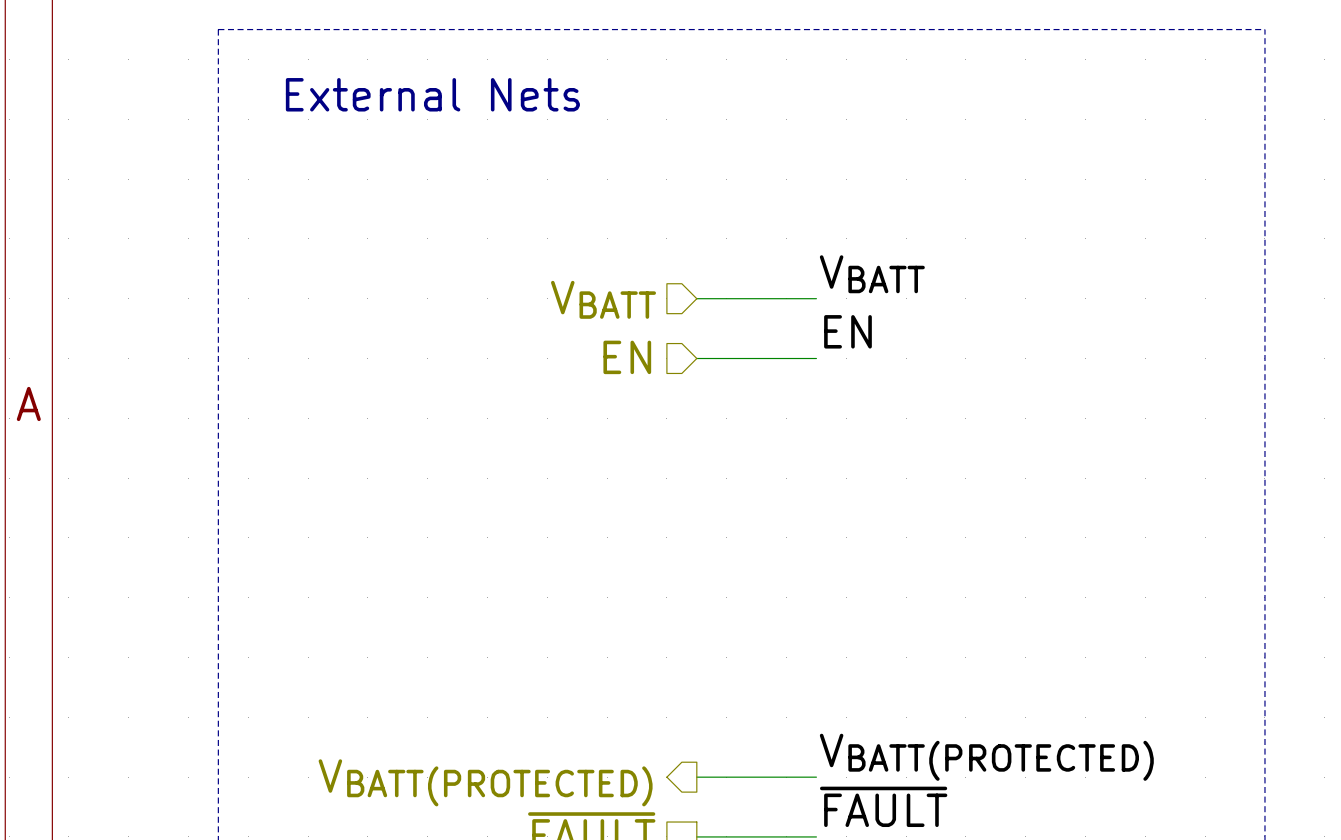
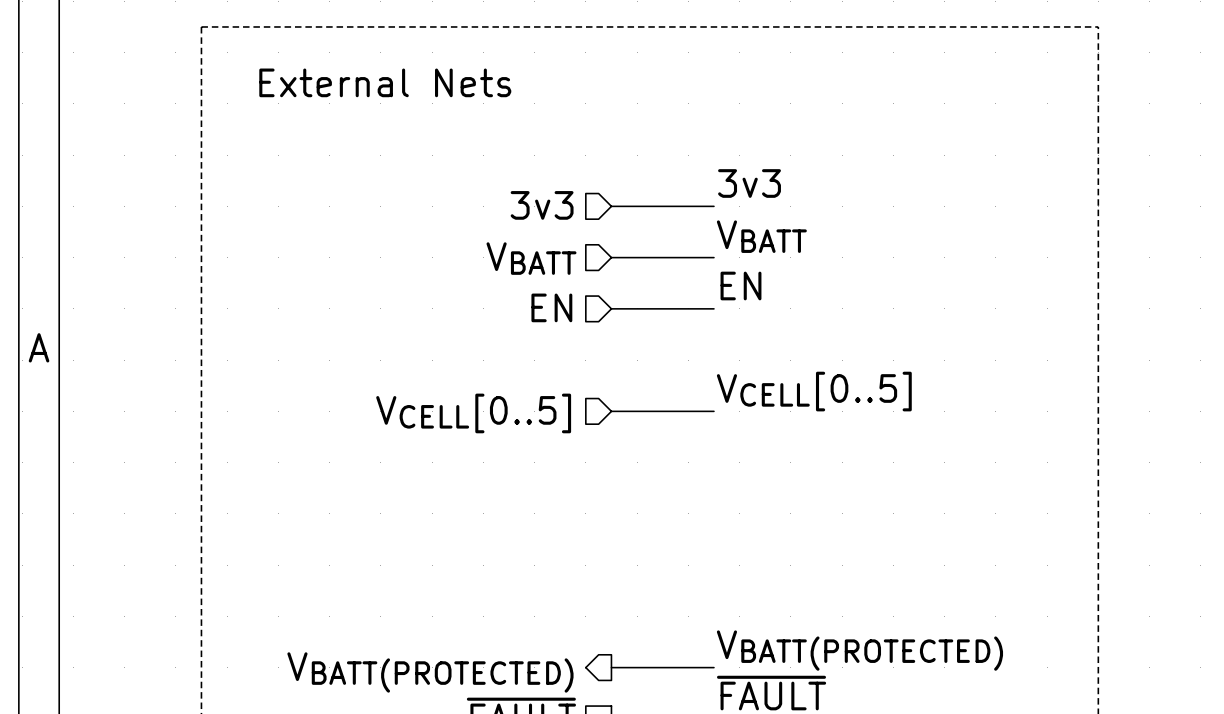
label: none -> 3v3 (749, 183)
hierarchical label: none -> 3v3 (542, 205)
wire: none -> (611, 206) (713, 206)
label: none -> VCELL[0..5] (814, 391)
bus: none -> (611, 411) (713, 411)
hierarchical label: none -> VCELL[0..5] (473, 413)

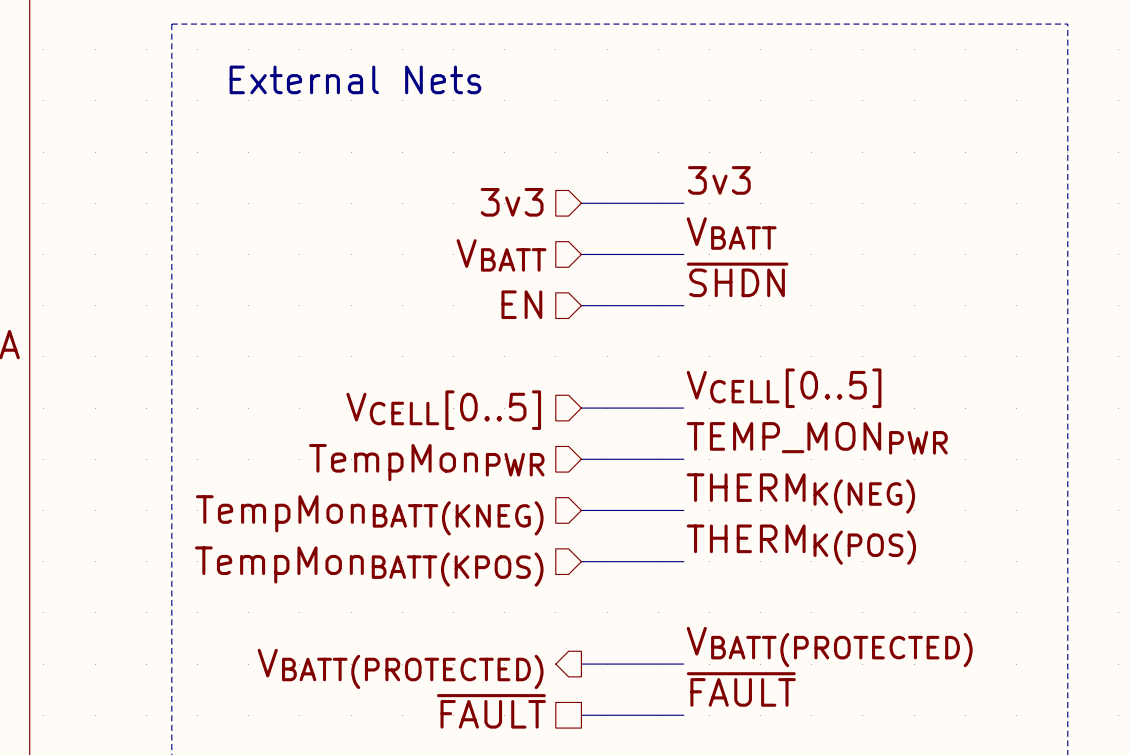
label: EN (740, 285) -> ~{SHDN} (737, 279)
label: none -> TEMP_MONPWR (817, 438)
wire: none -> (581, 459) (683, 459)
hierarchical label: none -> TempMonPWR (426, 462)
label: none -> THERMK(NEG) (800, 493)
wire: none -> (581, 510) (683, 510)
hierarchical label: none -> TempMonBATT(KNEG) (369, 515)
label: none -> THERMK(POS) (801, 544)
wire: none -> (581, 561) (683, 561)
hierarchical label: none -> TempMonBATT(KPOS) (369, 566)

